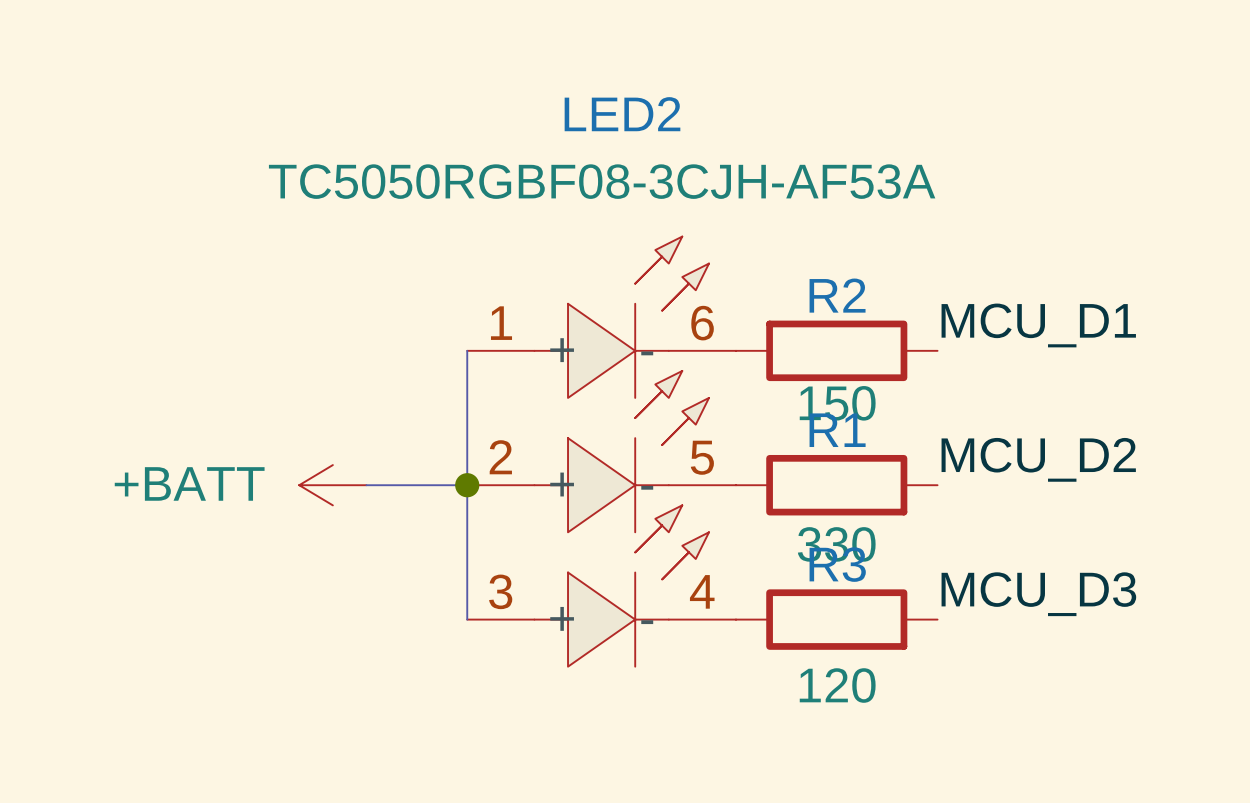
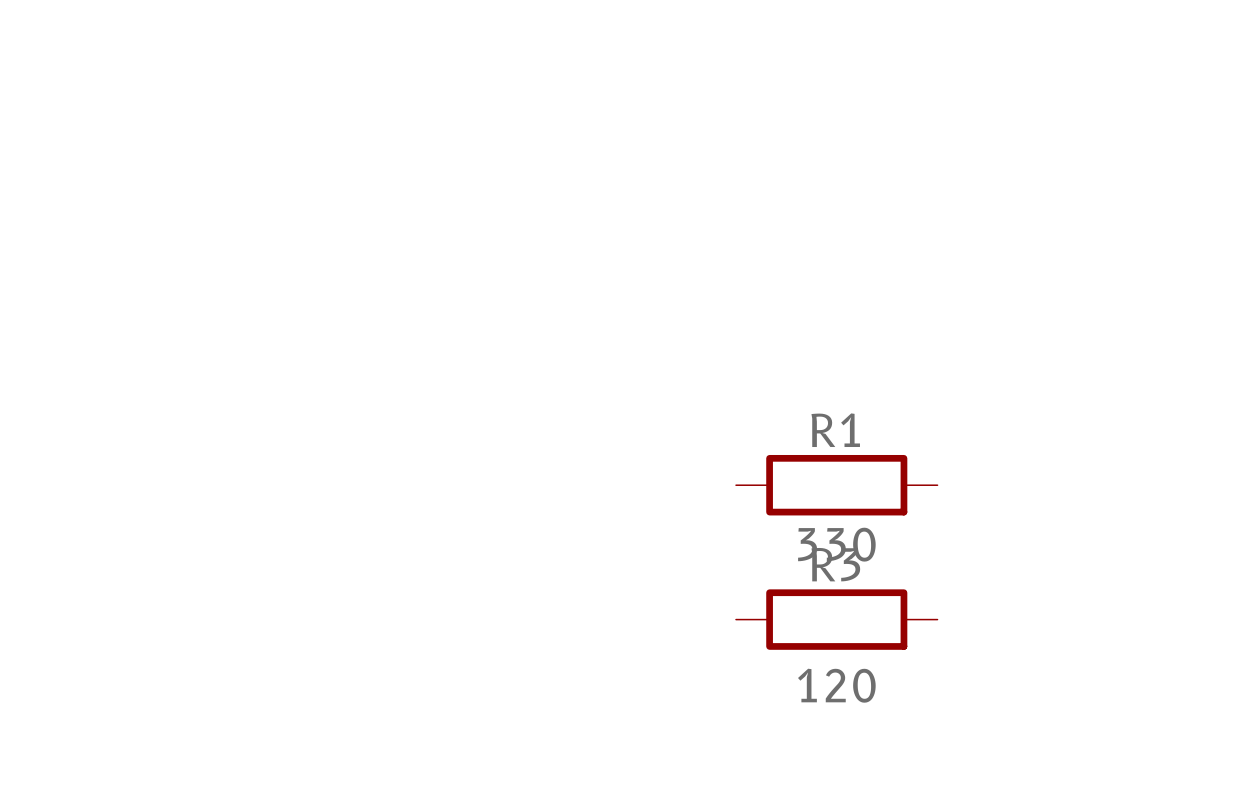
label: MCU_D1 (1038, 325) -> none
bus: (467, 350) (467, 619) -> none
R2: 150 (836, 350) -> none
LED2: TC5050RGBF08-3CJH-AF53A (601, 451) -> none
label: MCU_D2 (1038, 459) -> none
power symbol: +BATT (332, 485) -> none
bus: (366, 485) (467, 485) -> none
junction: (467, 485) -> none
label: MCU_D3 (1038, 594) -> none

